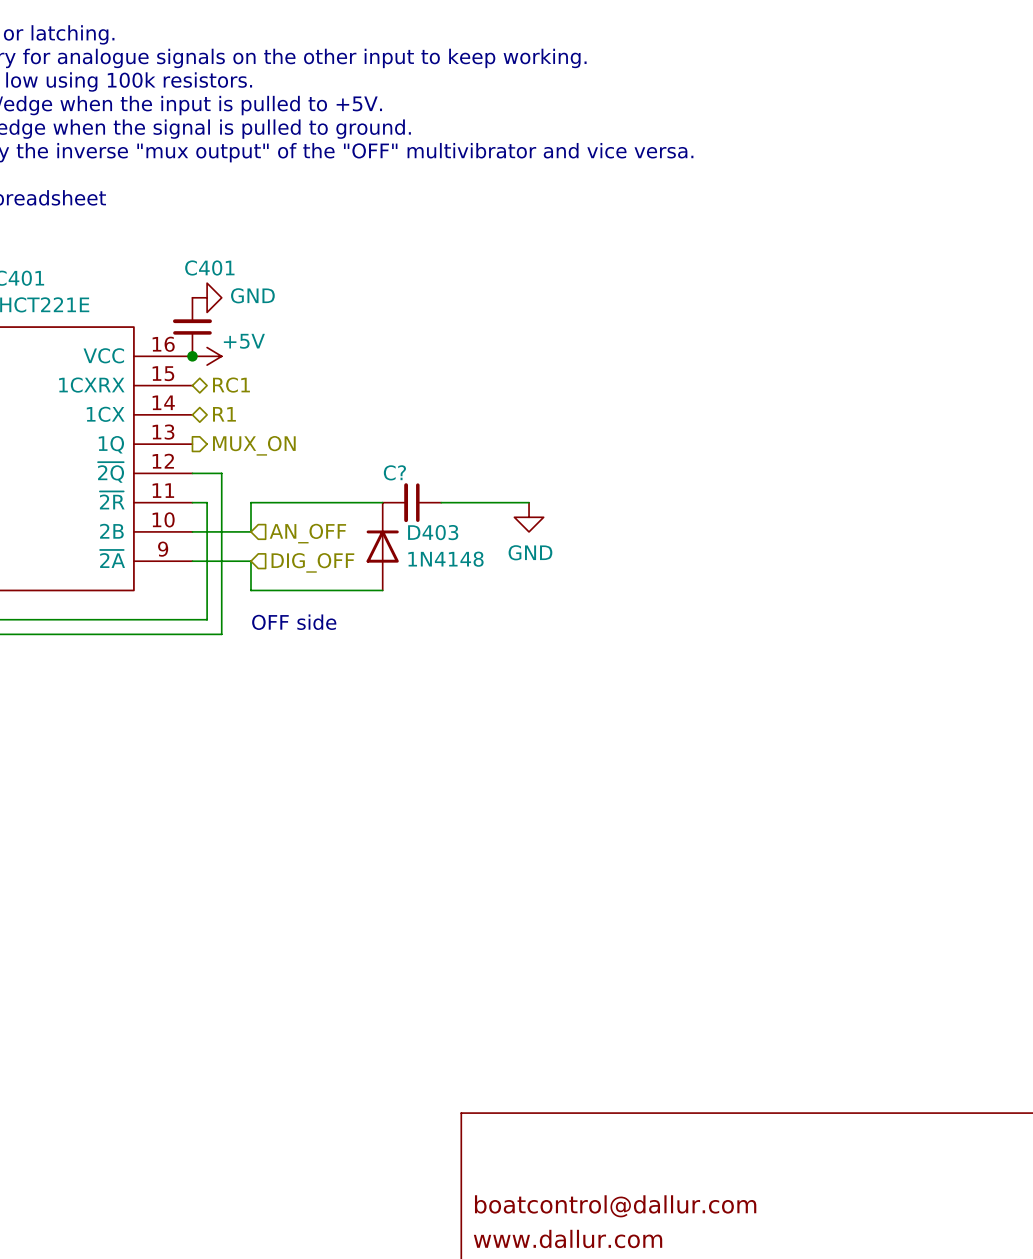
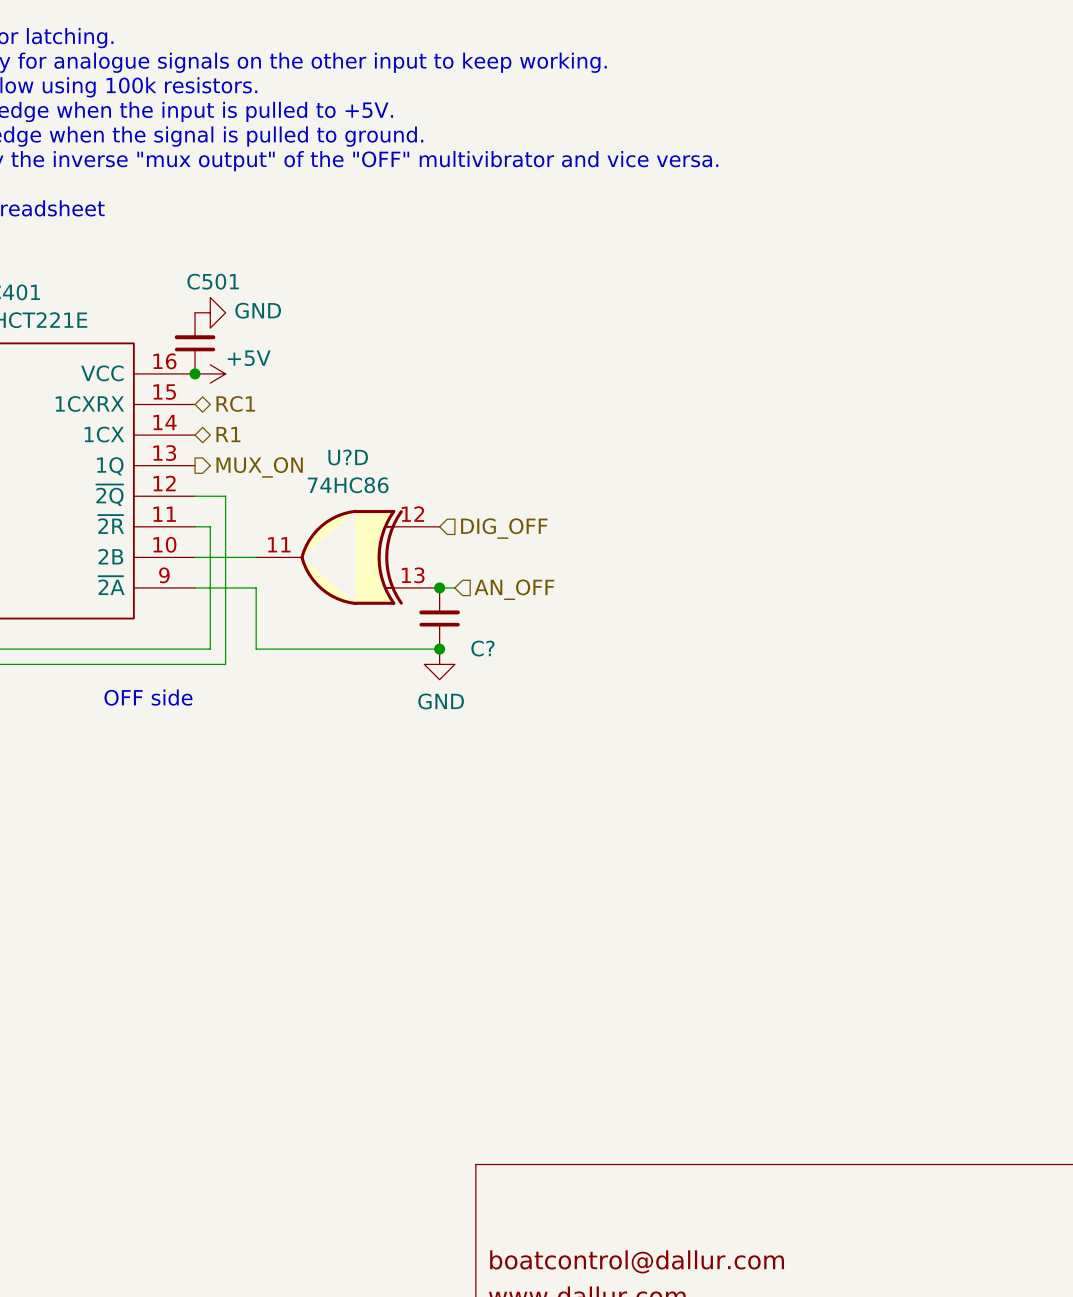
C401 name: C401 (209, 267) -> C501 (213, 281)
C? name position: C? (394, 472) -> C? (482, 648)
wire: (382, 502) (250, 502) (250, 531) -> none
C? rotation: 0° (411, 502) -> 90° clockwise (439, 618)
C? position: (411, 502) -> (439, 618)
wire: (441, 502) (529, 502) -> none
power symbol position: GND (529, 517) -> GND (439, 664)
U?D: none -> 74HC86 (347, 557)
hierarchical label position: AN_OFF (307, 533) -> AN_OFF (514, 589)
D403: 1N4148 (382, 546) -> none
junction: none -> (439, 587)
hierarchical label position: DIG_OFF (312, 562) -> DIG_OFF (504, 528)
wire: (250, 590) (382, 590) -> (256, 618) (256, 649) (439, 649)
junction: none -> (439, 649)
text position: OFF side (294, 622) -> OFF side (148, 697)

